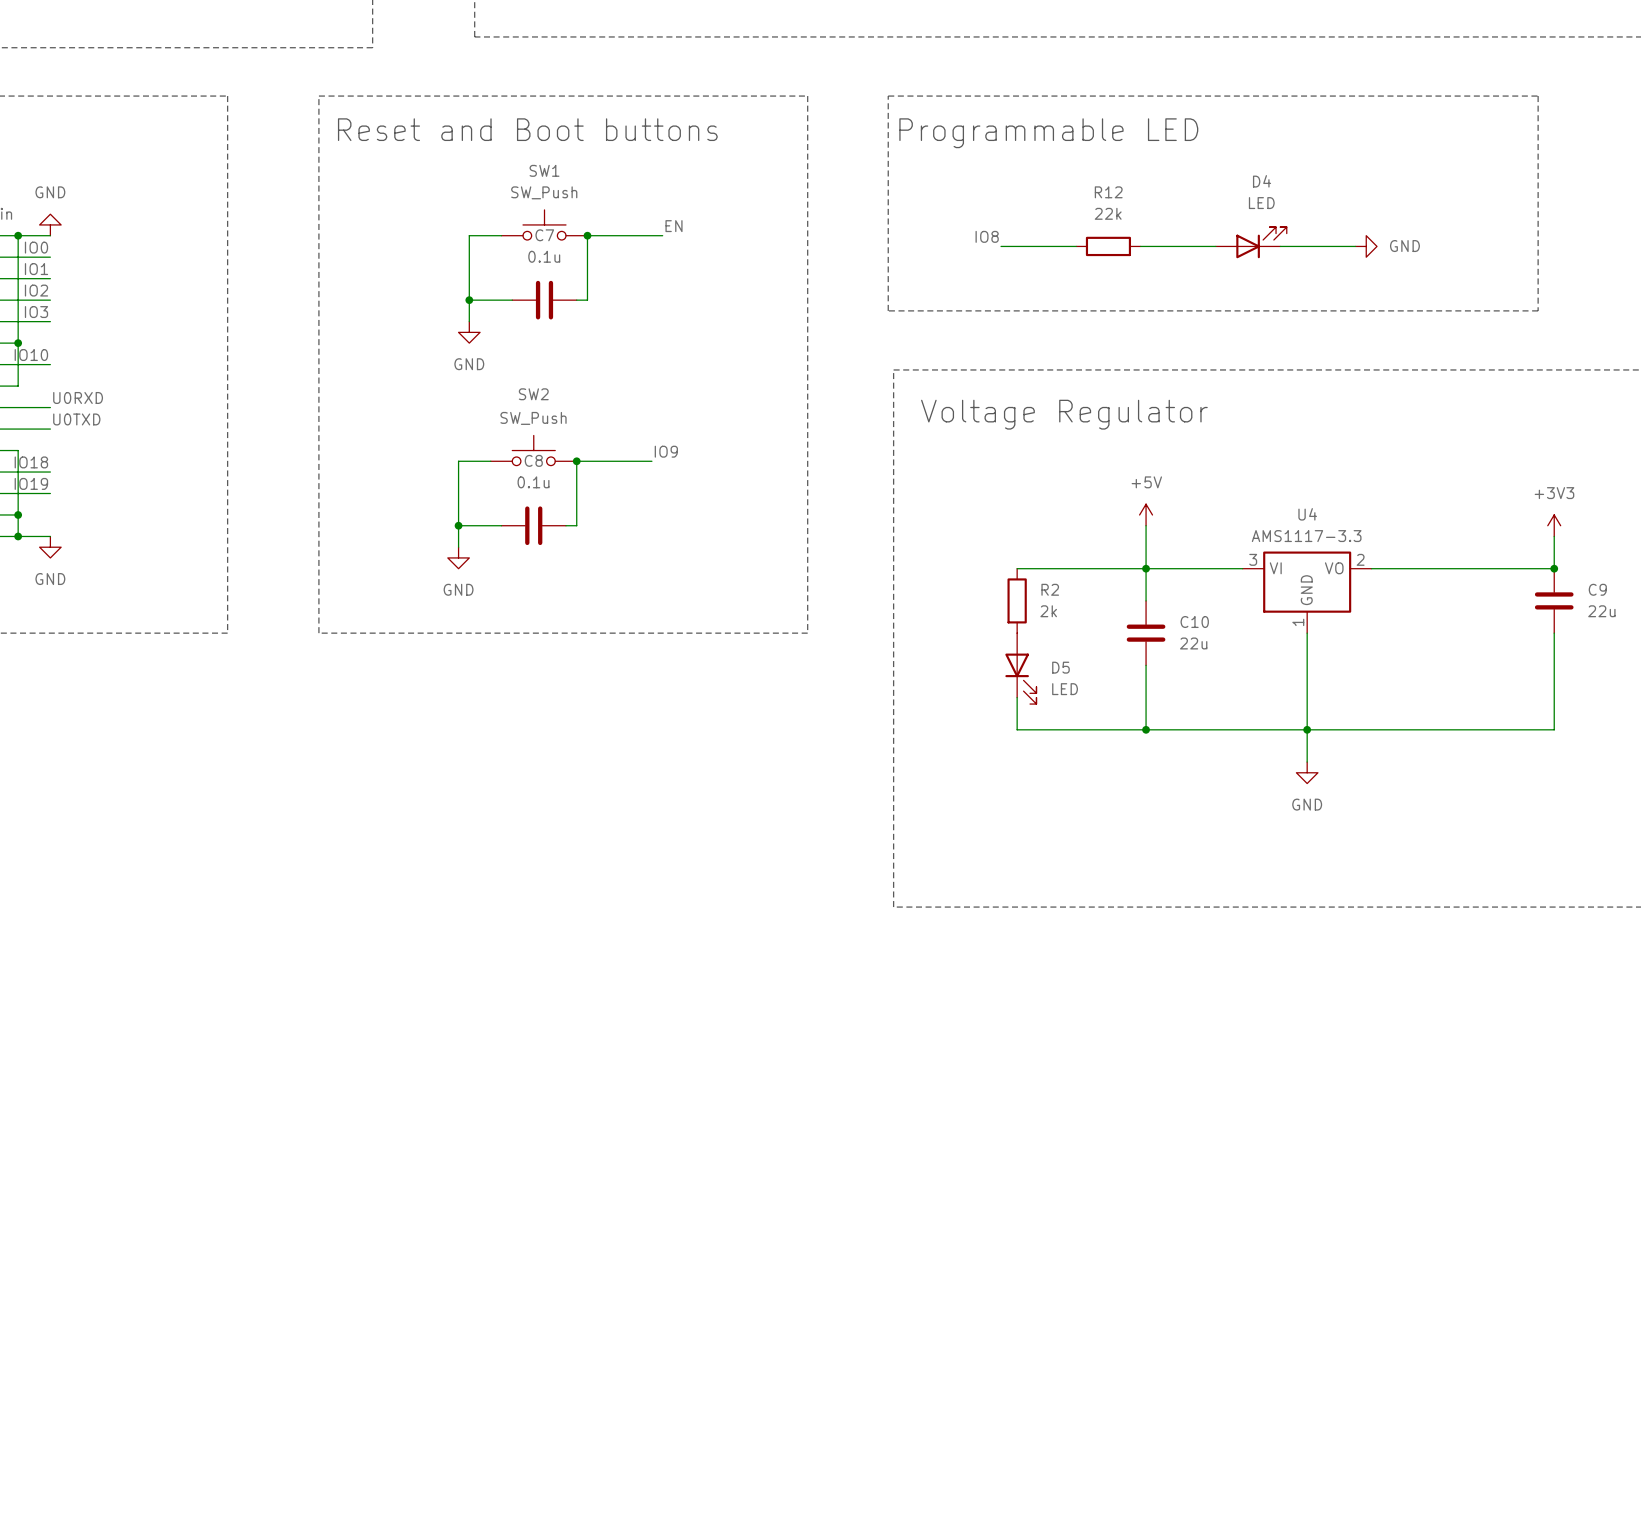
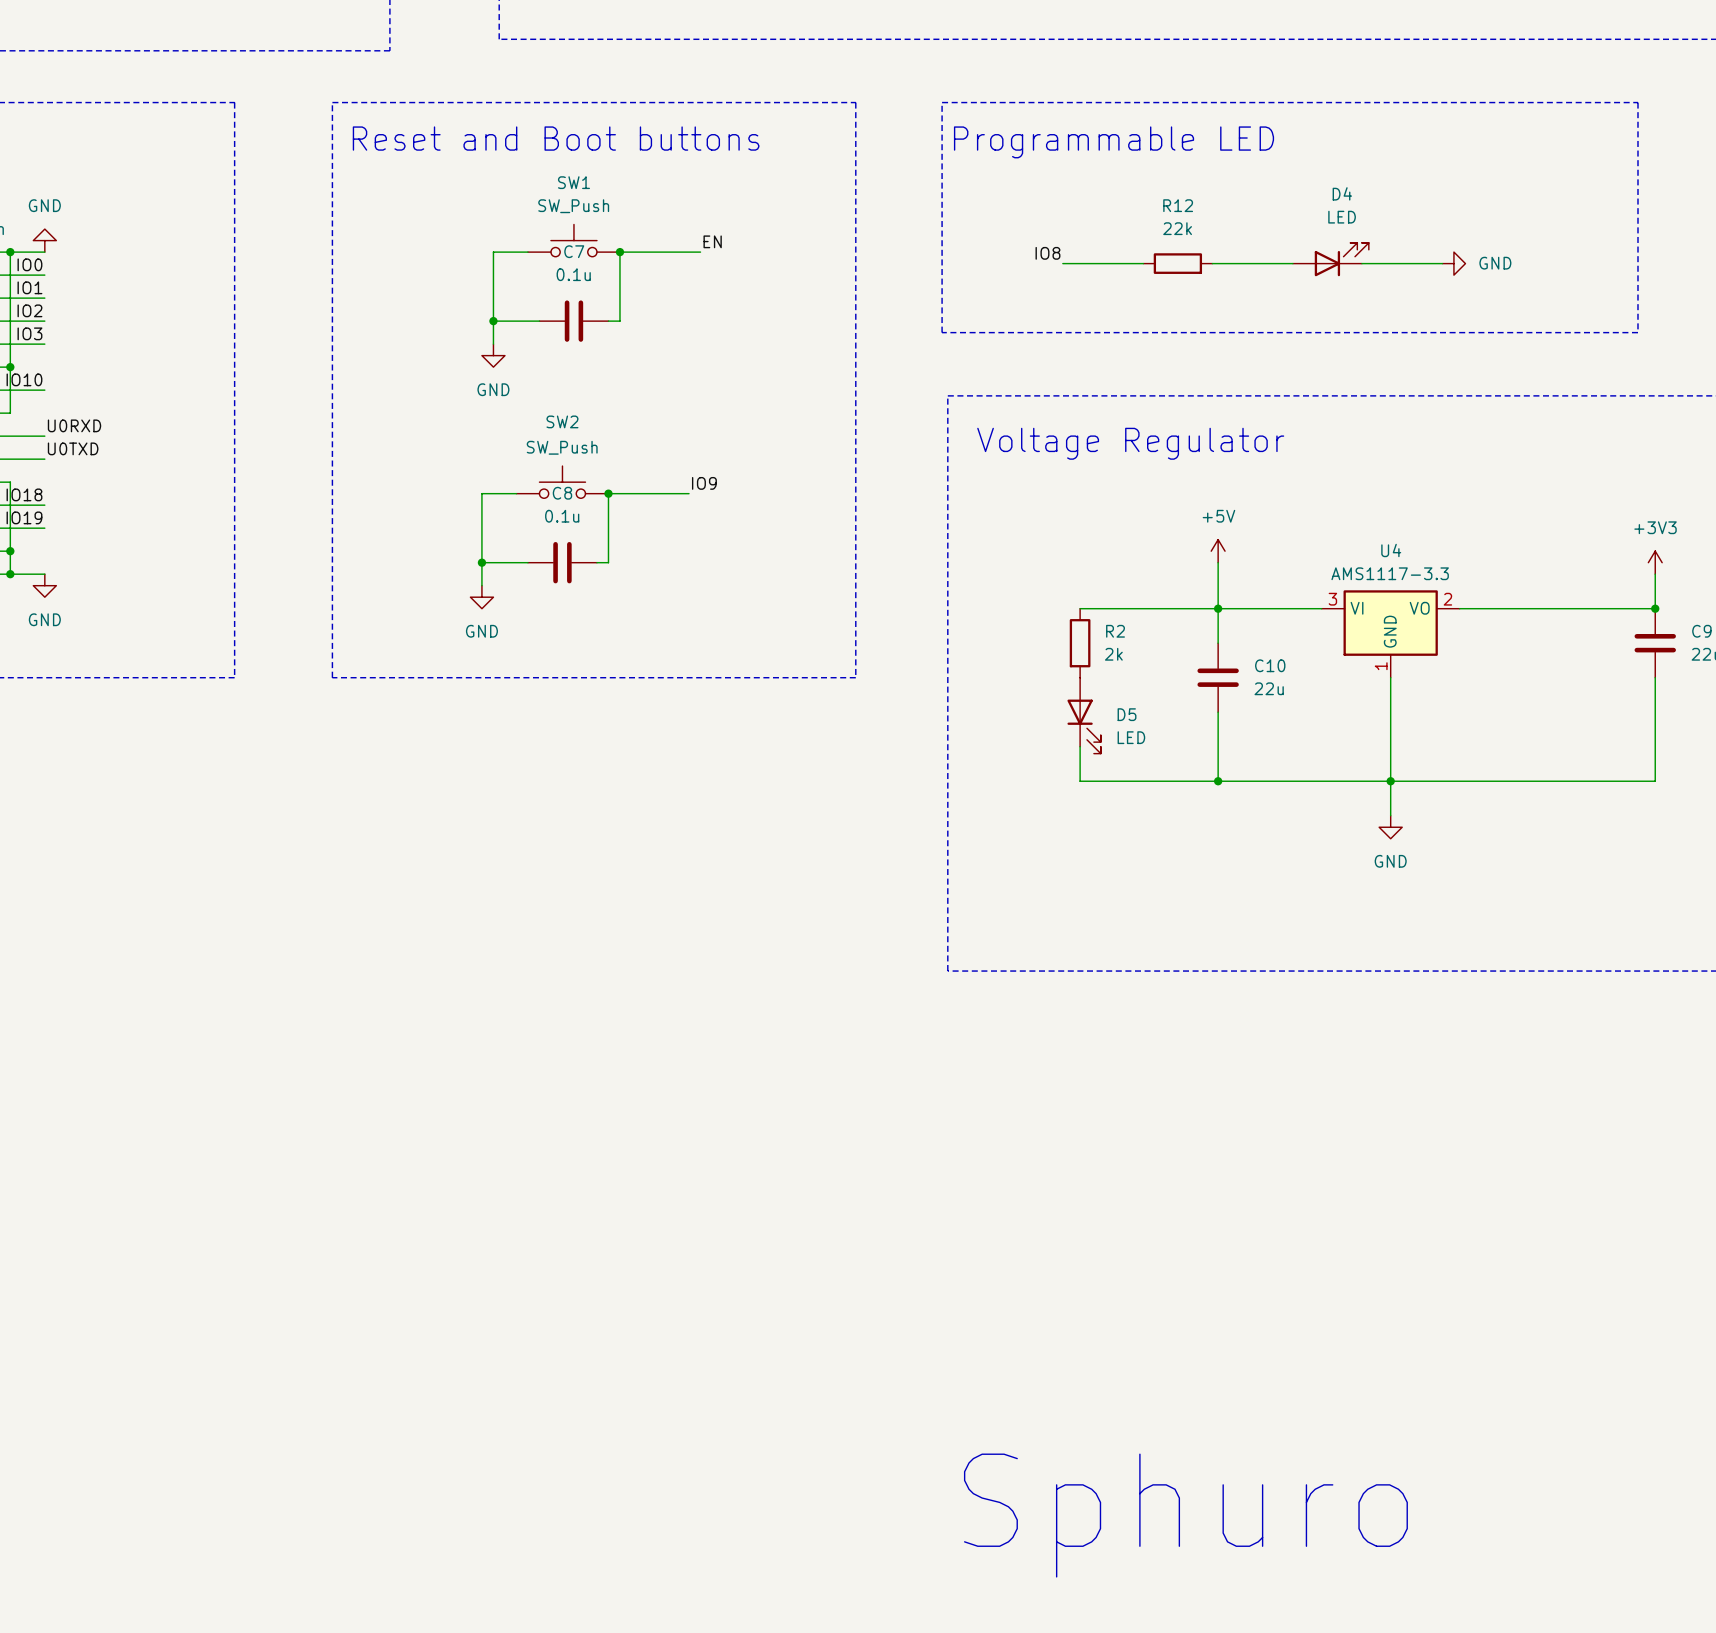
text: none -> Sphuro (1185, 1515)

